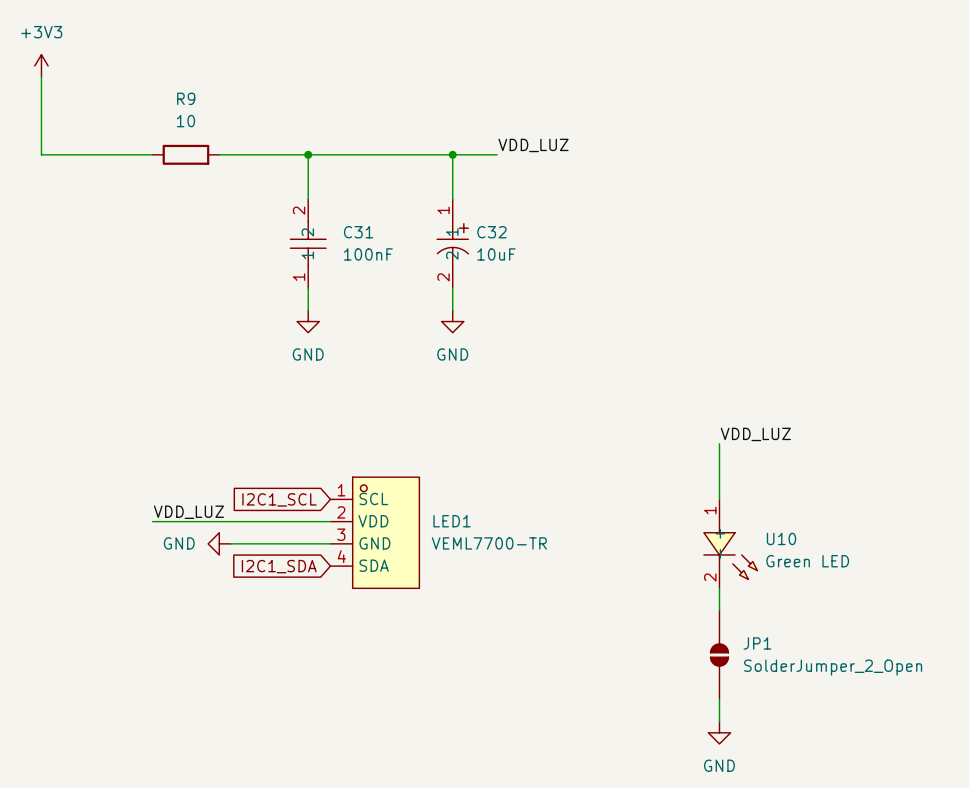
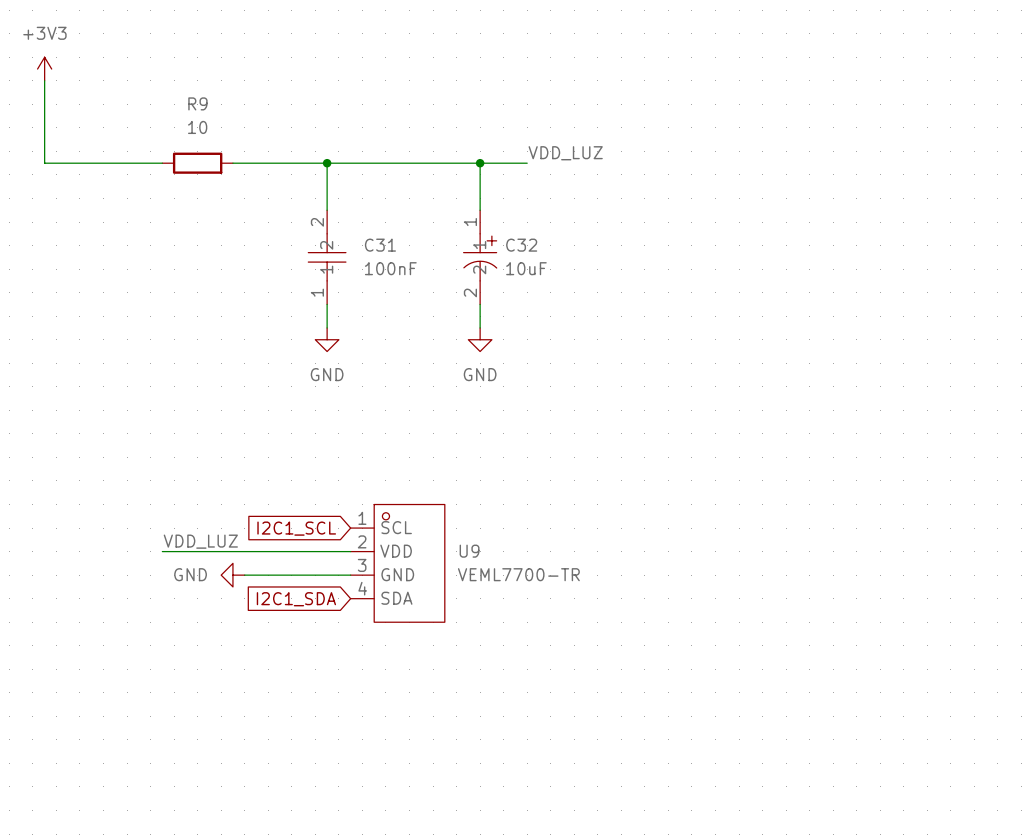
label: VDD_LUZ (755, 434) -> none
wire: (719, 443) (719, 499) -> none
LED1 name: LED1 (452, 521) -> U9 (469, 551)
U10: Green LED (730, 543) -> none
wire: (719, 588) (719, 610) -> none
JP1: SolderJumper_2_Open (719, 655) -> none
wire: (719, 699) (719, 721) -> none
power symbol: GND (719, 732) -> none

